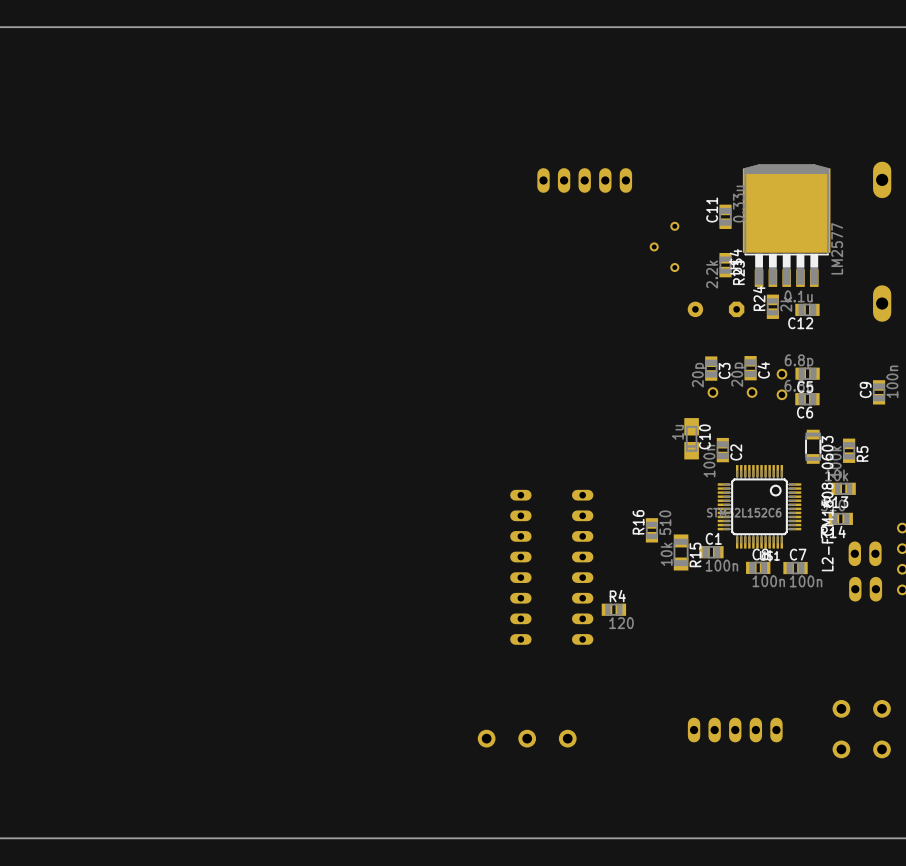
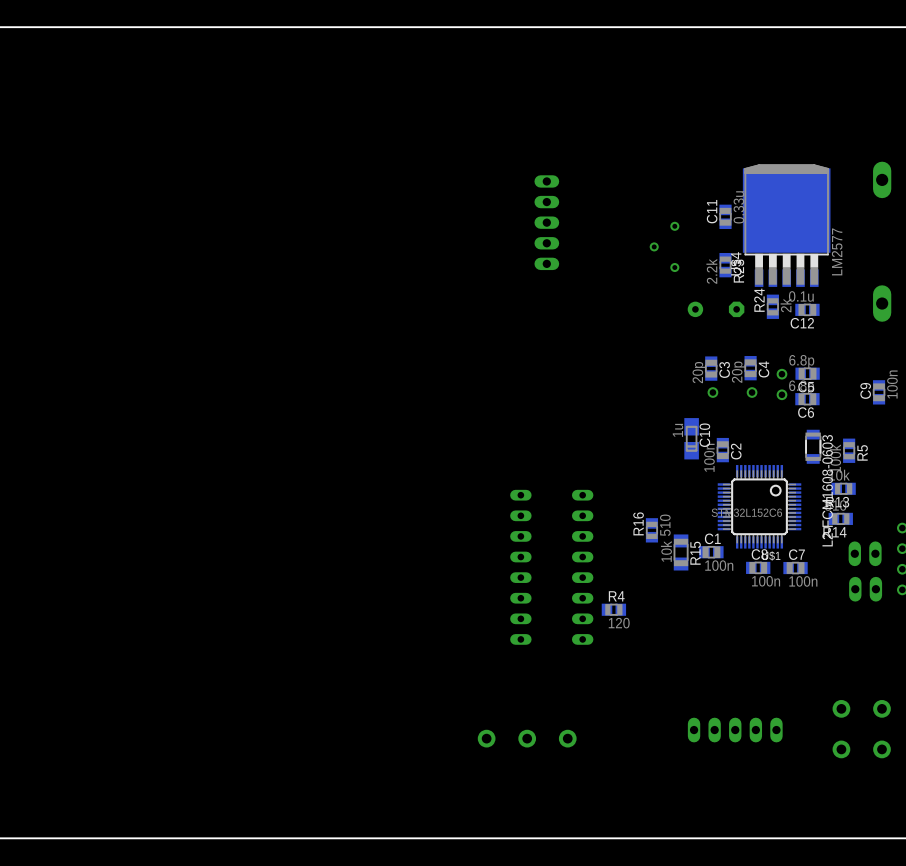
part rotation: 0° (584, 180) -> 90° clockwise (546, 222)

